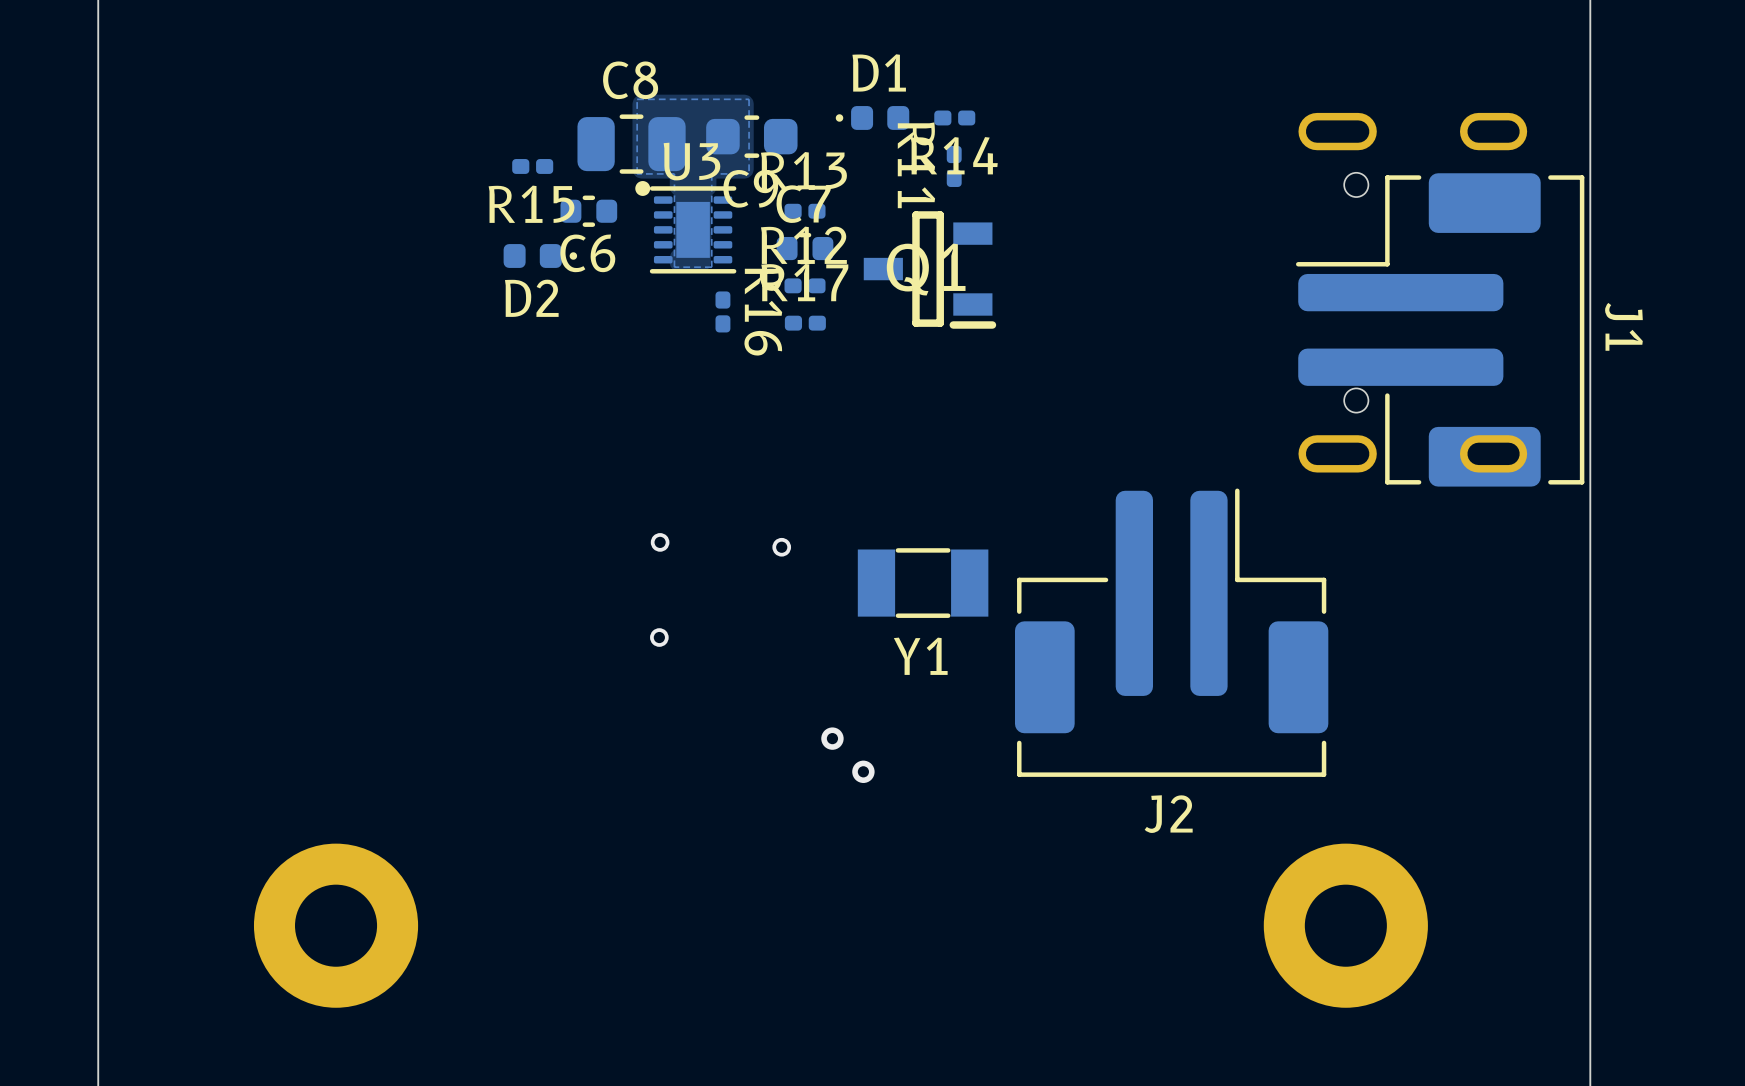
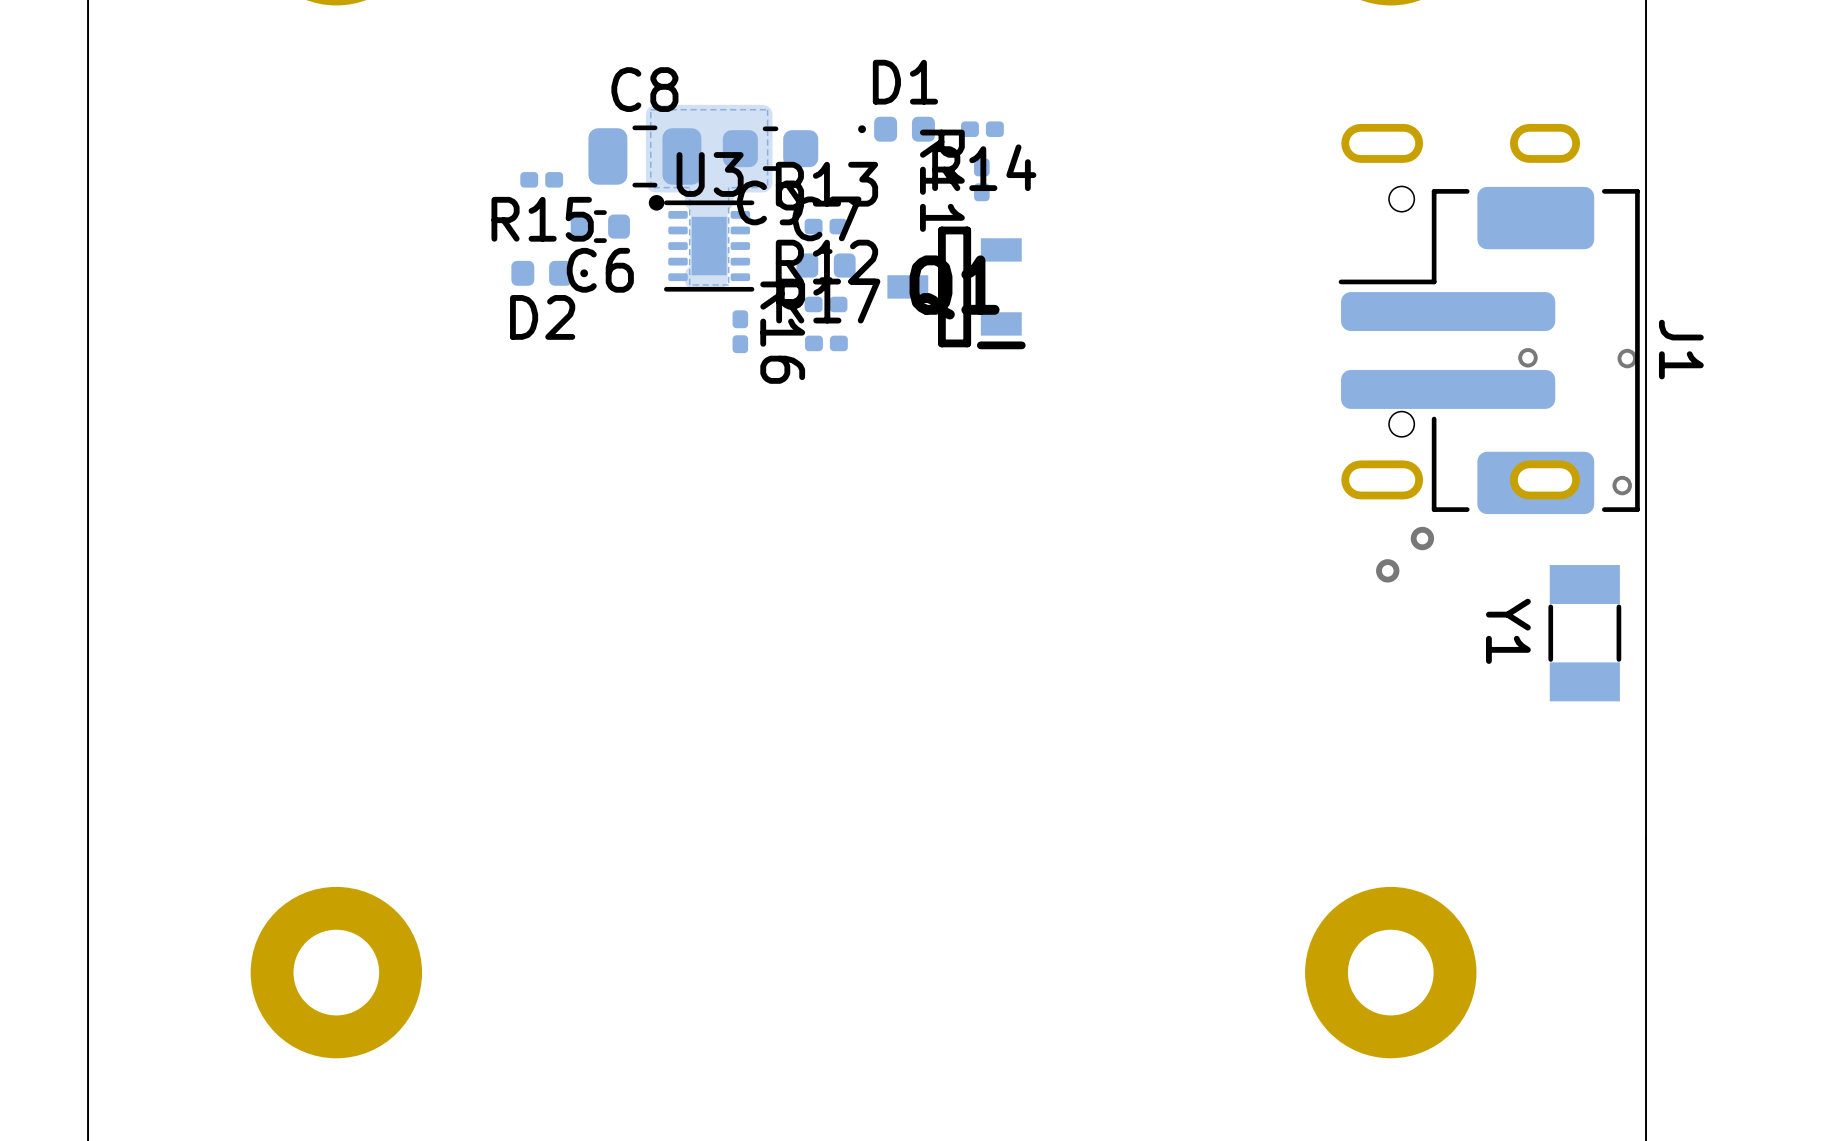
via: none -> (1527, 357)
via: none -> (1627, 358)
via: none -> (1622, 485)
via: none -> (1422, 538)
via: none -> (1387, 570)
via: (660, 542) -> none
via: (781, 547) -> none
Y1 rotation: 0° (923, 583) -> 90° clockwise (1584, 633)
Y1 position: (923, 583) -> (1584, 633)
J2: (1171, 632) -> none
via: (659, 637) -> none
via: (832, 738) -> none
via: (863, 771) -> none

